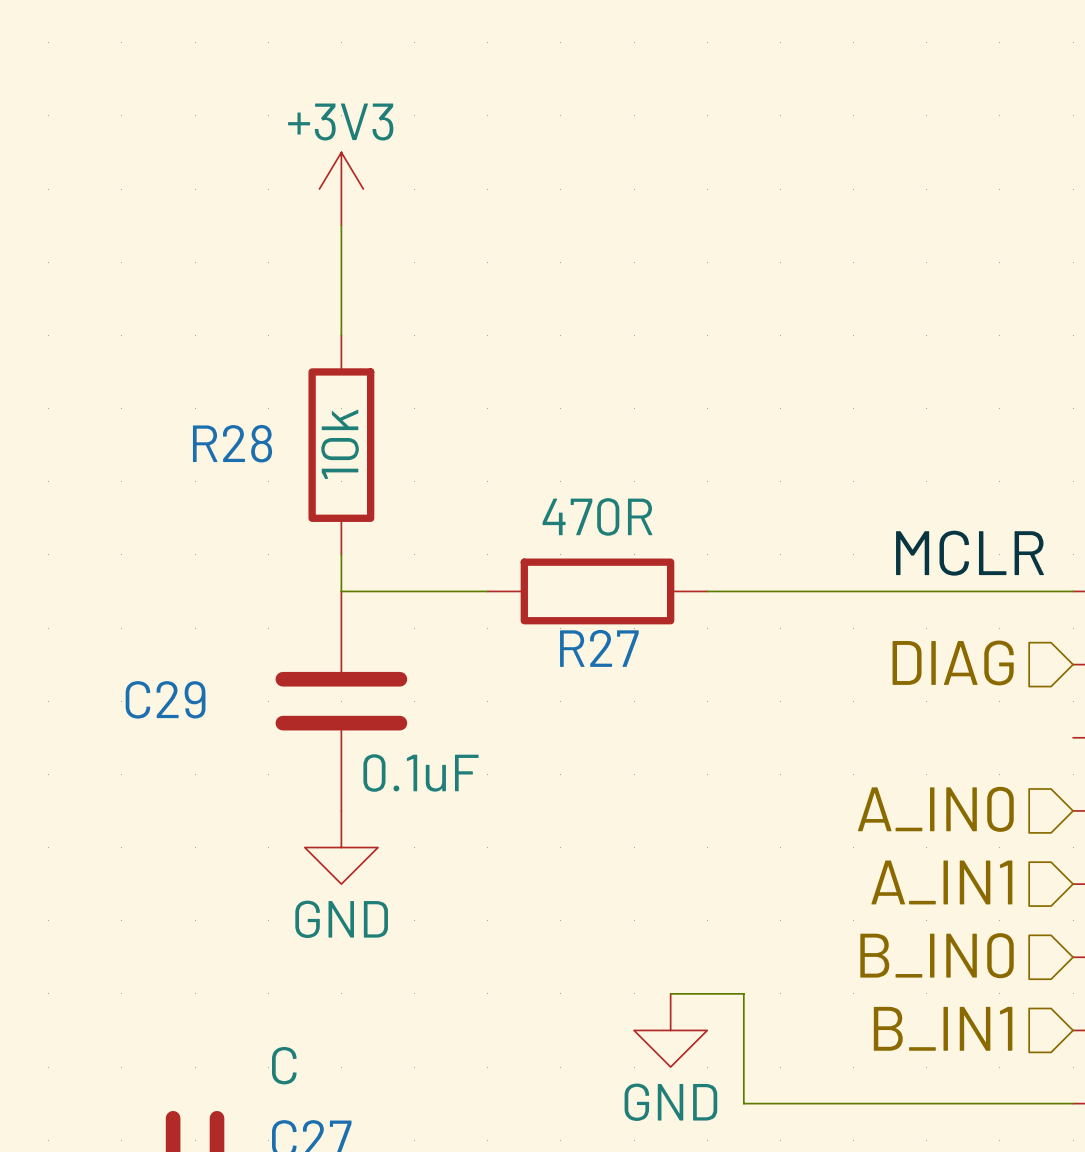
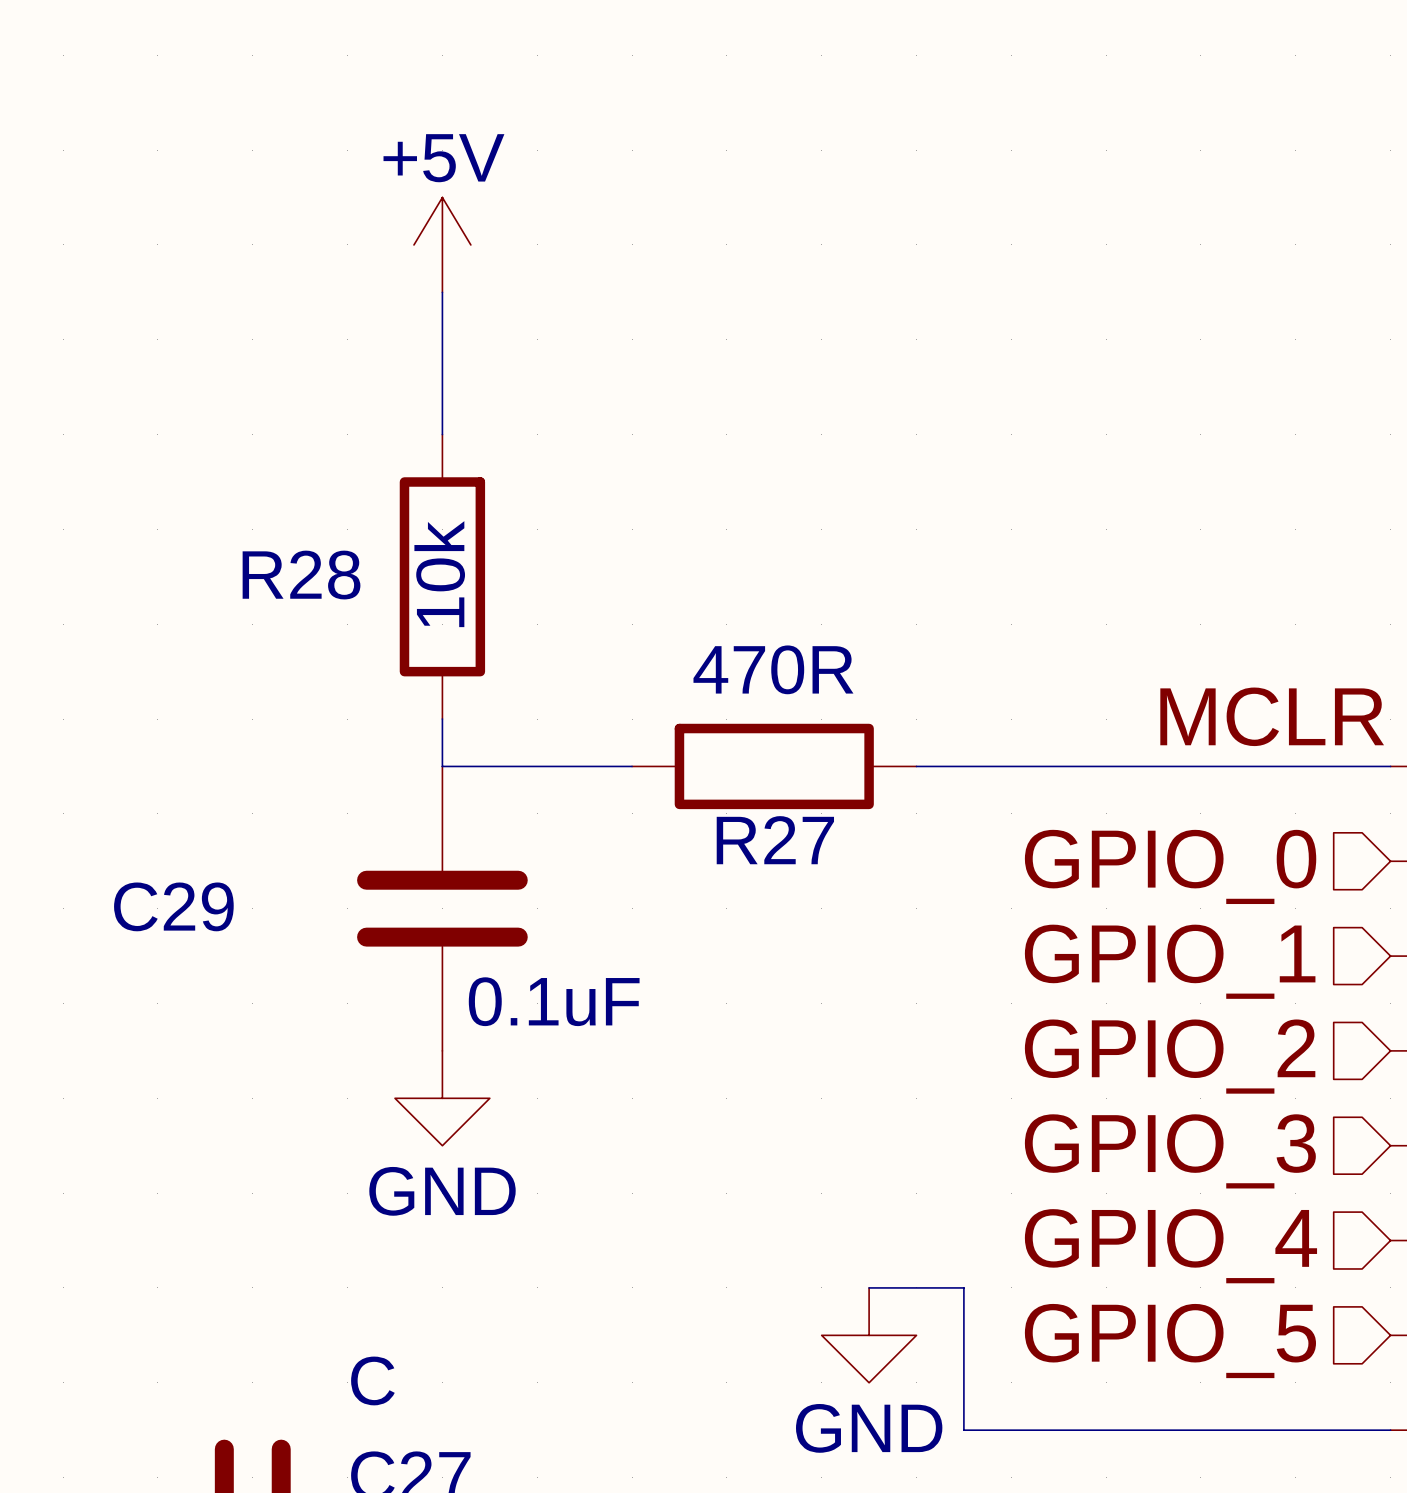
power symbol: +3V3 (341, 189) -> +5V (442, 244)
hierarchical label: DIAG (953, 662) -> GPIO_0 (1170, 866)
C29 name position: C29 (165, 699) -> C29 (173, 906)
hierarchical label: none -> GPIO_1 (1170, 961)
hierarchical label: A_IN0 (935, 809) -> GPIO_2 (1170, 1056)
hierarchical label: A_IN1 (941, 882) -> GPIO_3 (1170, 1151)
hierarchical label: B_IN0 (937, 955) -> GPIO_4 (1170, 1246)
hierarchical label: B_IN1 (943, 1028) -> GPIO_5 (1170, 1341)

